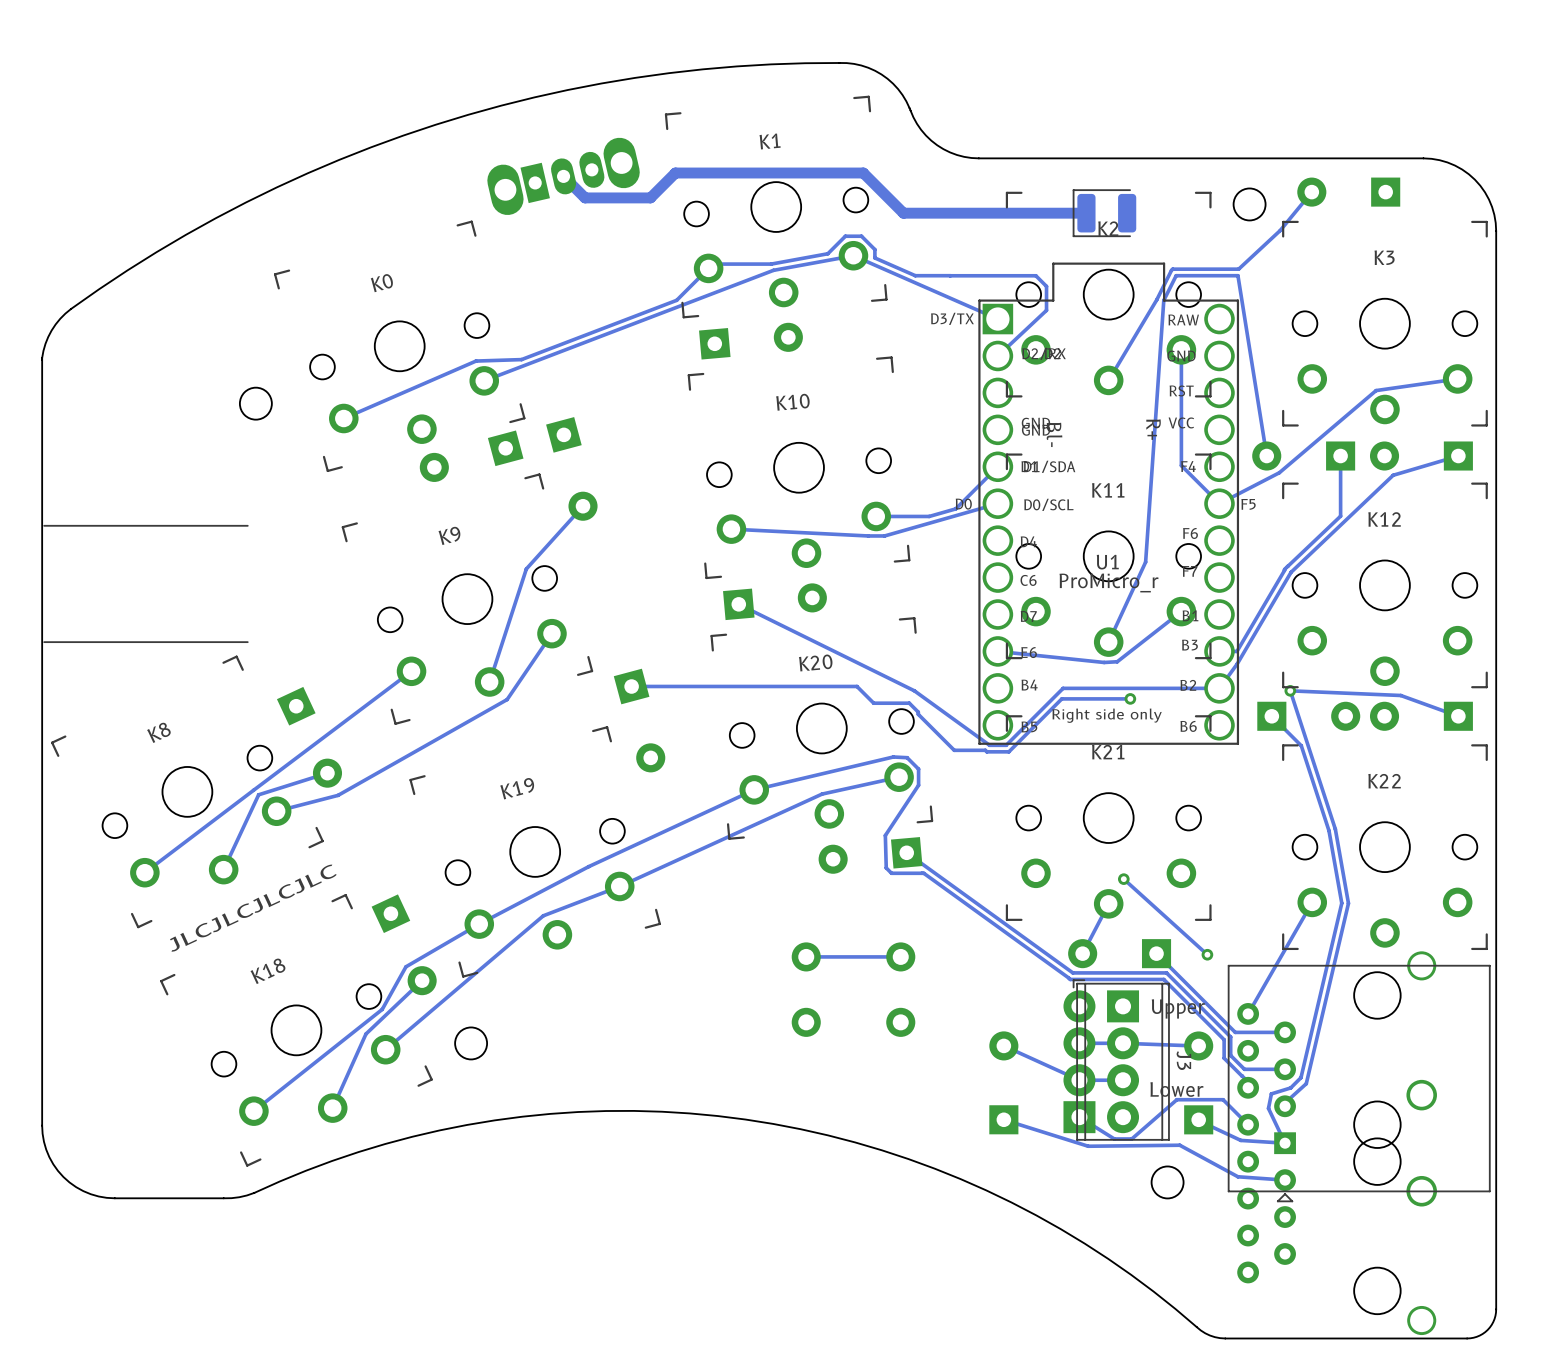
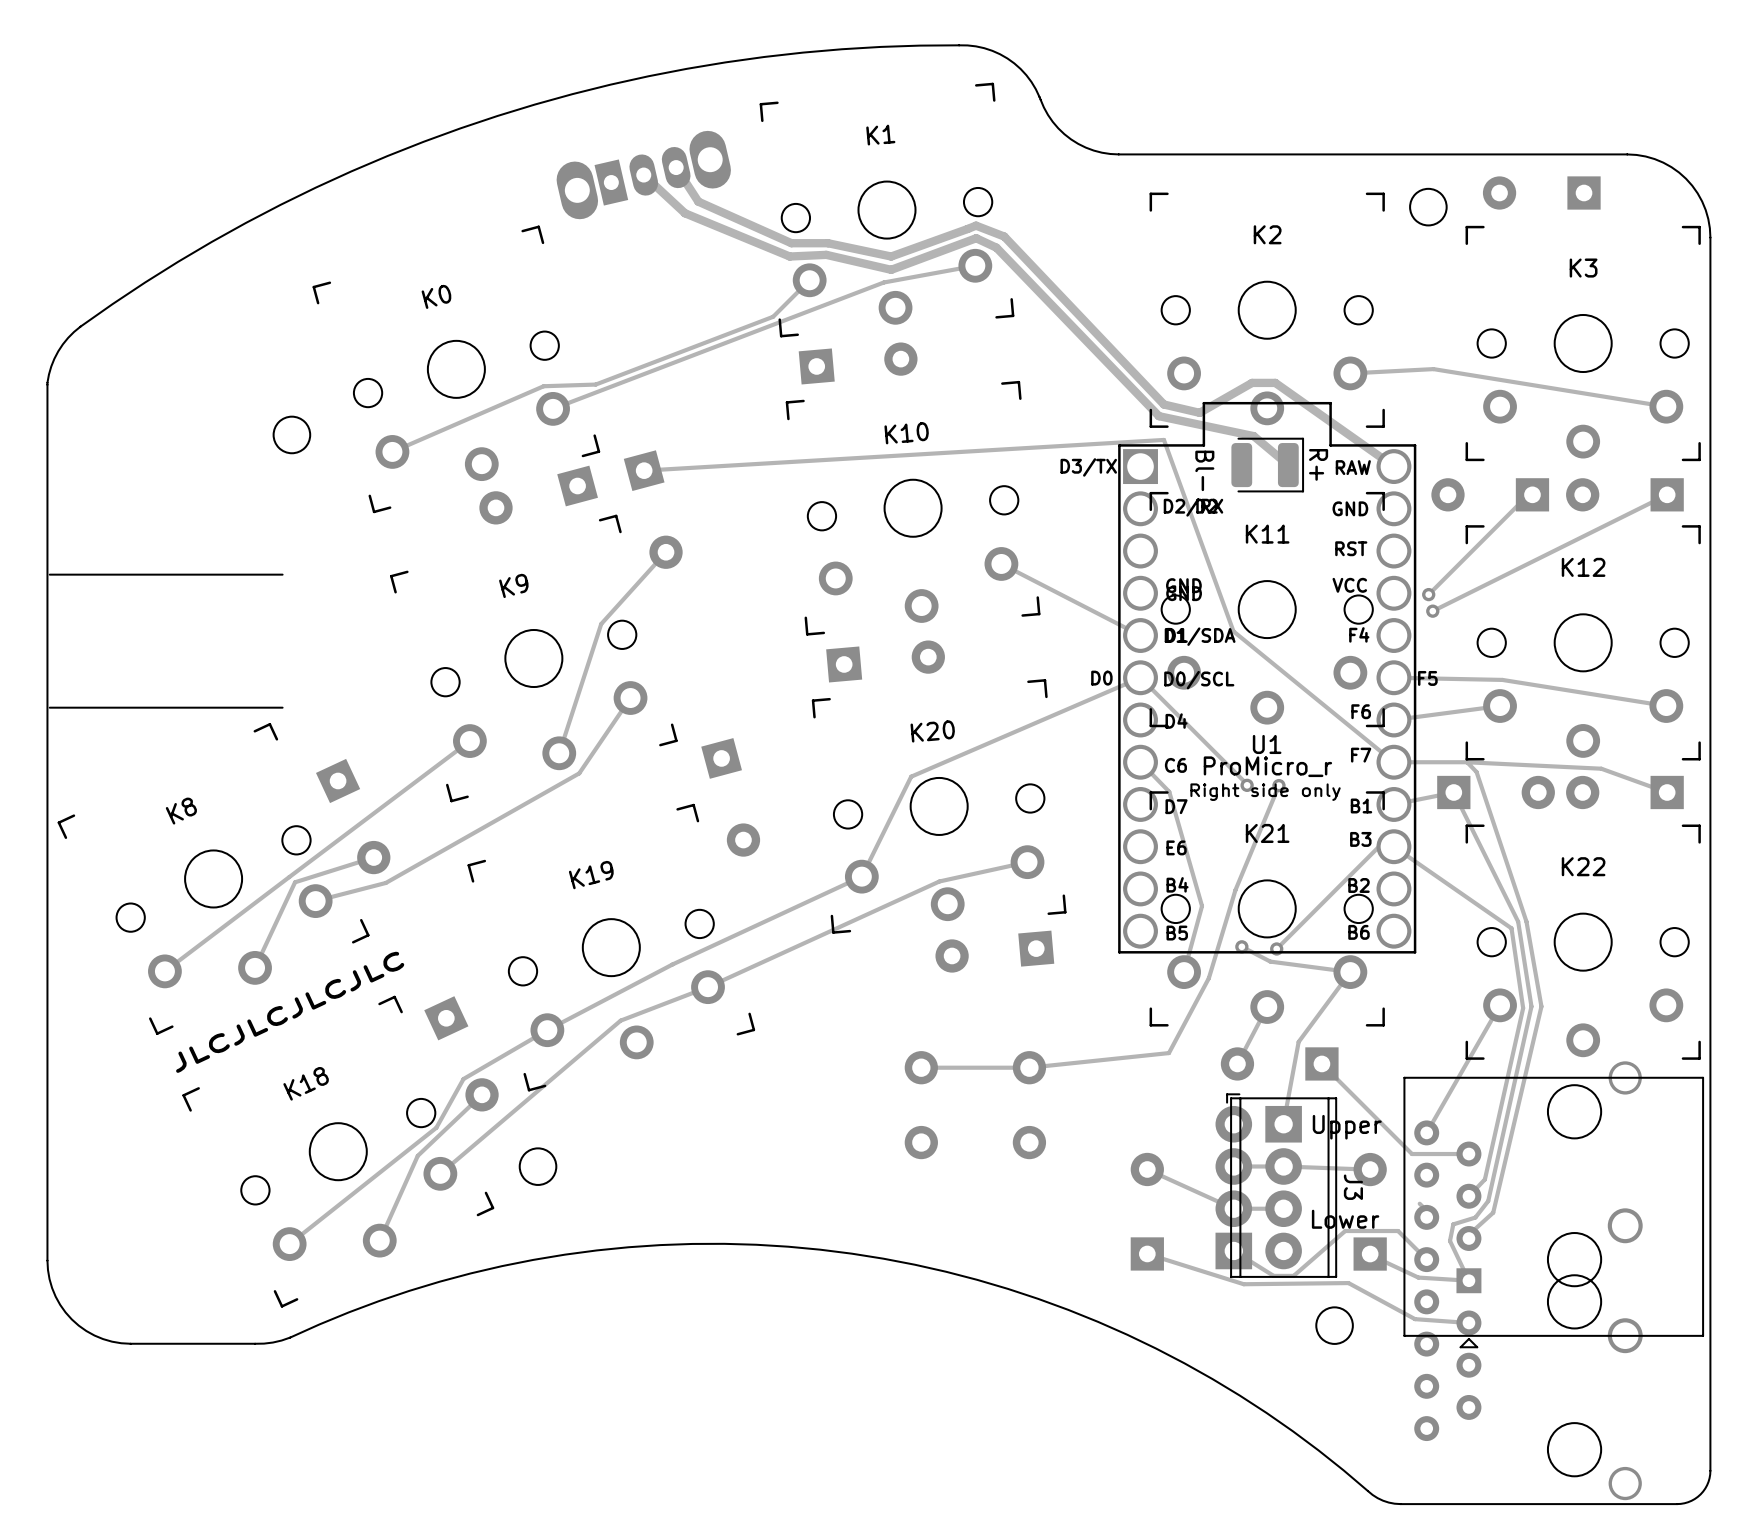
track: none -> (676, 167) (698, 201) (791, 243) (828, 243) (891, 256) (976, 225) (1004, 236) (1163, 404) (1199, 412) (1252, 382) (1275, 382) (1393, 466)
track: (563, 176) (585, 197) (650, 197) (675, 173) (863, 173) (903, 213) (1086, 213) -> (643, 175) (685, 213) (789, 256) (826, 254) (891, 269) (976, 238) (996, 247) (1158, 416) (1253, 436) (1288, 465)
track: (1311, 192) (1280, 230) (1238, 269) (1172, 269) (1108, 380) -> none
part rotation: 0° (1104, 213) -> 180° (1267, 465)
part position: (1104, 213) -> (1267, 465)
track: (853, 255) (997, 319) -> none
track: (708, 268) (712, 264) (771, 264) (827, 253) (845, 236) (861, 236) (874, 249) (874, 257) (915, 275) (1035, 275) (1046, 286) (1046, 310) (997, 355) -> none
track: (1181, 349) (1181, 465) (1219, 503) (1279, 472) (1376, 390) (1457, 378) -> (1350, 373) (1433, 369) (1666, 406)
track: none -> (644, 470) (1163, 439) (1233, 631) (1393, 762) (1467, 762) (1476, 772) (1526, 921)
track: none -> (1531, 492) (1428, 594)
track: (1266, 456) (1237, 275) (1176, 275) (1163, 300) (1145, 562) (1108, 642) -> none
track: (1340, 456) (1340, 516) (1287, 566) -> none
track: (1458, 456) (1393, 475) (1291, 572) (1237, 663) (1219, 688) (1063, 688) (1006, 745) (989, 745) (914, 690) (738, 604) -> (1667, 494) (1432, 611)
track: (997, 466) (955, 508) (929, 516) (876, 516) -> (1140, 635) (1001, 563)
track: (997, 503) (884, 535) (731, 529) -> none
U1 position: (1108, 503) -> (1267, 677)
via: none -> (1428, 594)
via: none -> (1432, 611)
track: (1287, 566) (1236, 651) (1219, 651) -> none
track: (1181, 611) (1117, 661) (1104, 662) (997, 651) -> none
track: none -> (1393, 677) (1502, 679) (1666, 706)
track: none -> (1500, 706) (1393, 719)
track: (631, 686) (856, 686) (873, 703) (909, 703) (954, 750) (986, 751) (1008, 751) (1061, 698) (1130, 698) -> none
track: none -> (1140, 762) (1169, 791) (1202, 906) (1184, 972)
via: (1290, 690) -> none
track: (1400, 695) (1290, 690) (1335, 829) -> (1601, 768) (1466, 762)
via position: (1130, 698) -> (1278, 785)
via: none -> (1247, 785)
track: none -> (1278, 785) (1235, 890) (1208, 978) (1168, 1053) (1029, 1067)
track: (1271, 716) (1301, 745) (1329, 830) (1341, 903) (1300, 1077) (1290, 1087) -> (1393, 804) (1453, 792) (1518, 921) (1531, 1006) (1488, 1201) (1475, 1217)
track: none -> (1378, 846) (1276, 948)
track: (754, 789) (893, 757) (907, 757) (918, 769) (918, 785) (885, 835) (886, 867) (891, 873) (923, 873) (1070, 979) (1163, 979) (1224, 1039) (1224, 1058) (1241, 1075) -> (861, 876) (911, 776) (1140, 677) (1247, 785)
track: none -> (1241, 946) (1270, 961) (1350, 972) (1298, 1041) (1283, 1123)
via: none -> (1241, 946)
track: (906, 852) (1072, 972) (1166, 972) (1230, 1037) (1230, 1055) (1244, 1069) (1285, 1069) -> (1393, 846) (1511, 928) (1523, 1008) (1484, 1179) (1468, 1196)
via: none -> (1276, 948)
track: (1123, 879) (1207, 954) -> none
via: (1123, 879) -> none
via: (1207, 954) -> none

